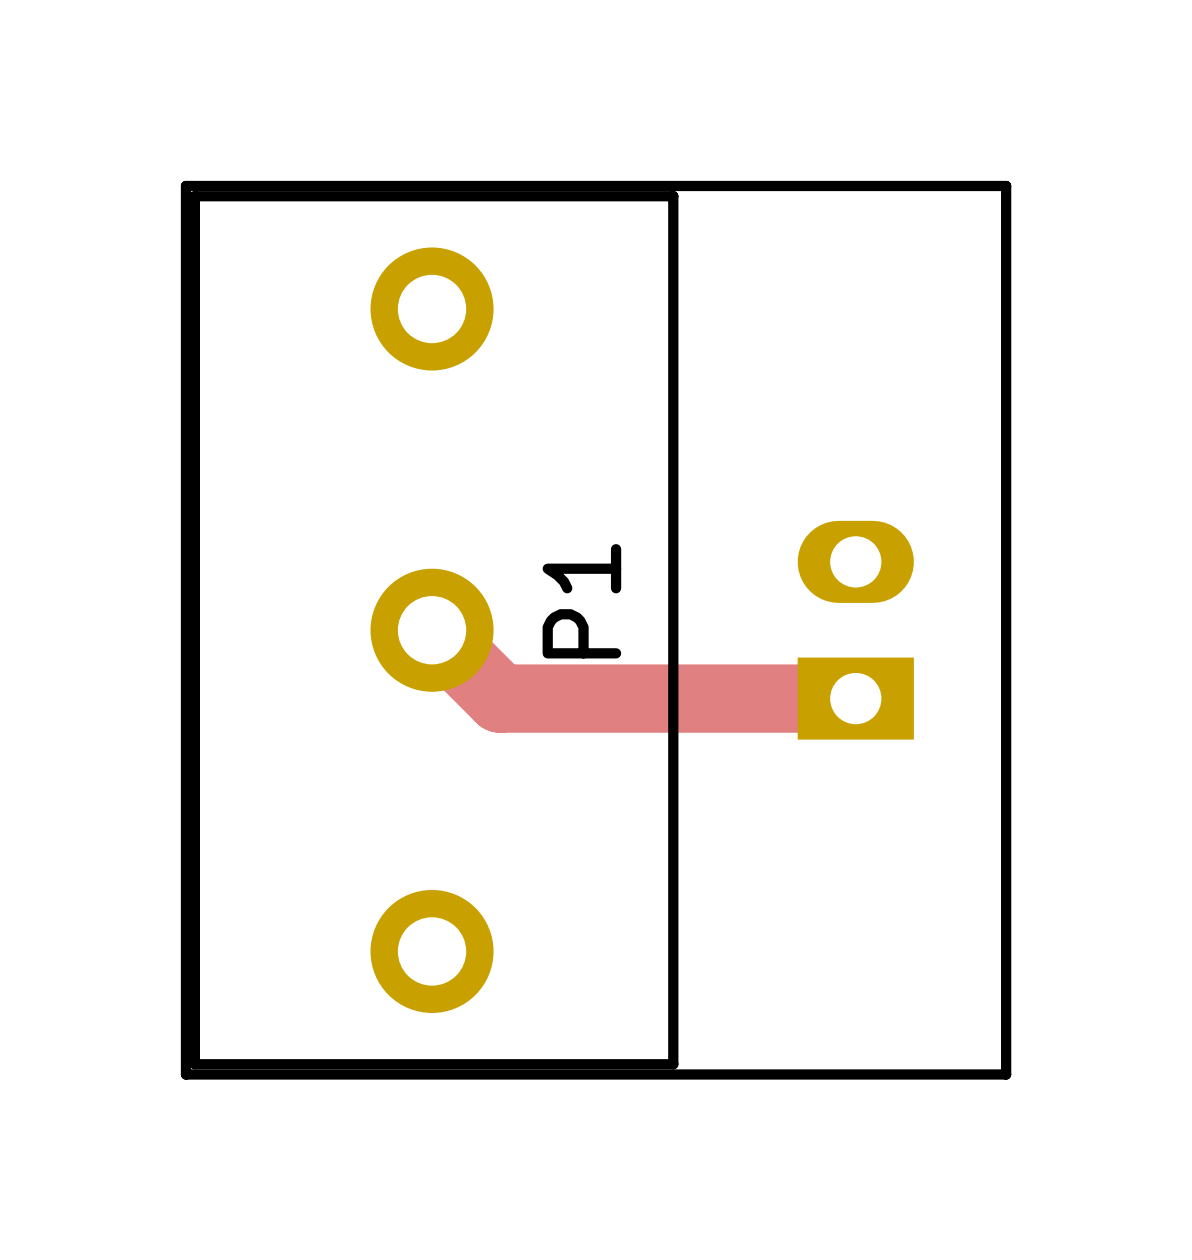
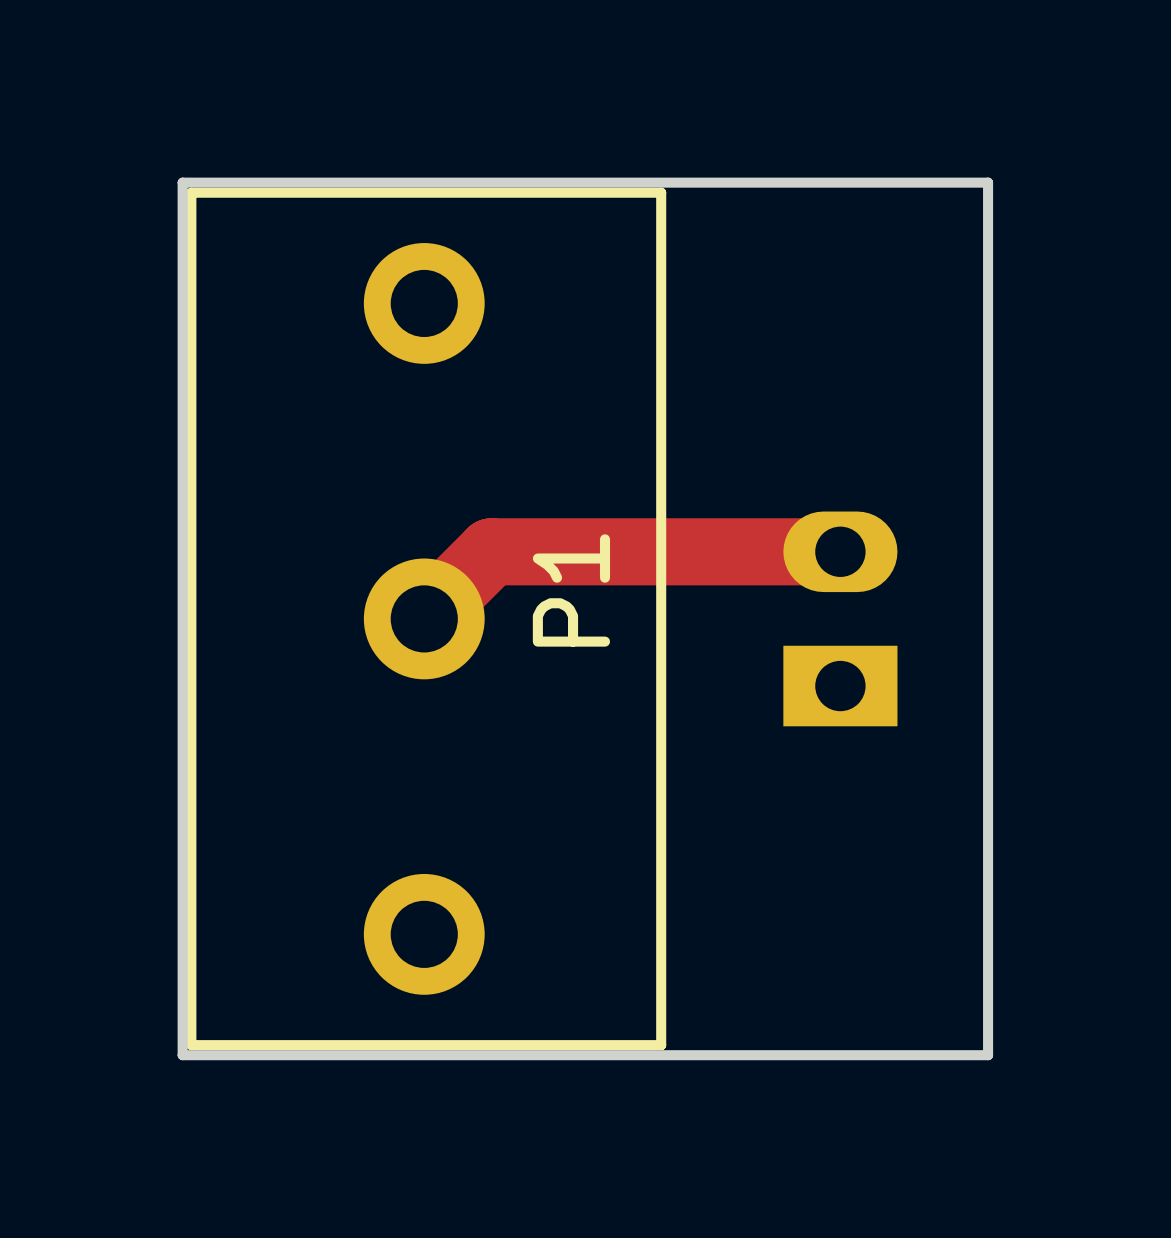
track: (432, 630) (500, 698) (855, 698) -> (424, 618) (491, 551) (833, 551)

